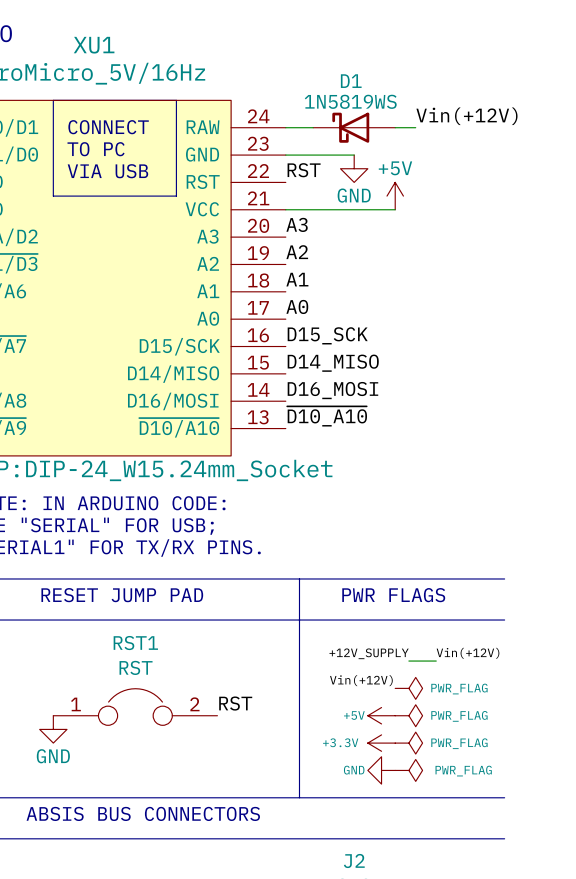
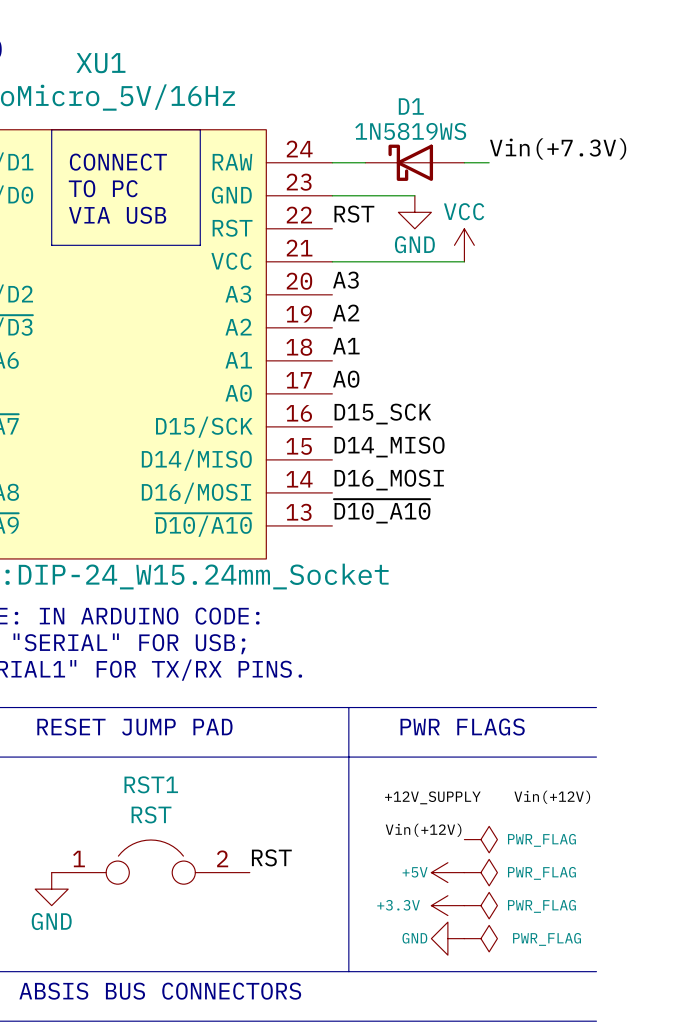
label: Vin(+12V) (466, 116) -> Vin(+7.3V) (558, 148)
power symbol: +5V (395, 196) -> VCC (464, 245)
wire: (408, 661) (436, 661) -> none

